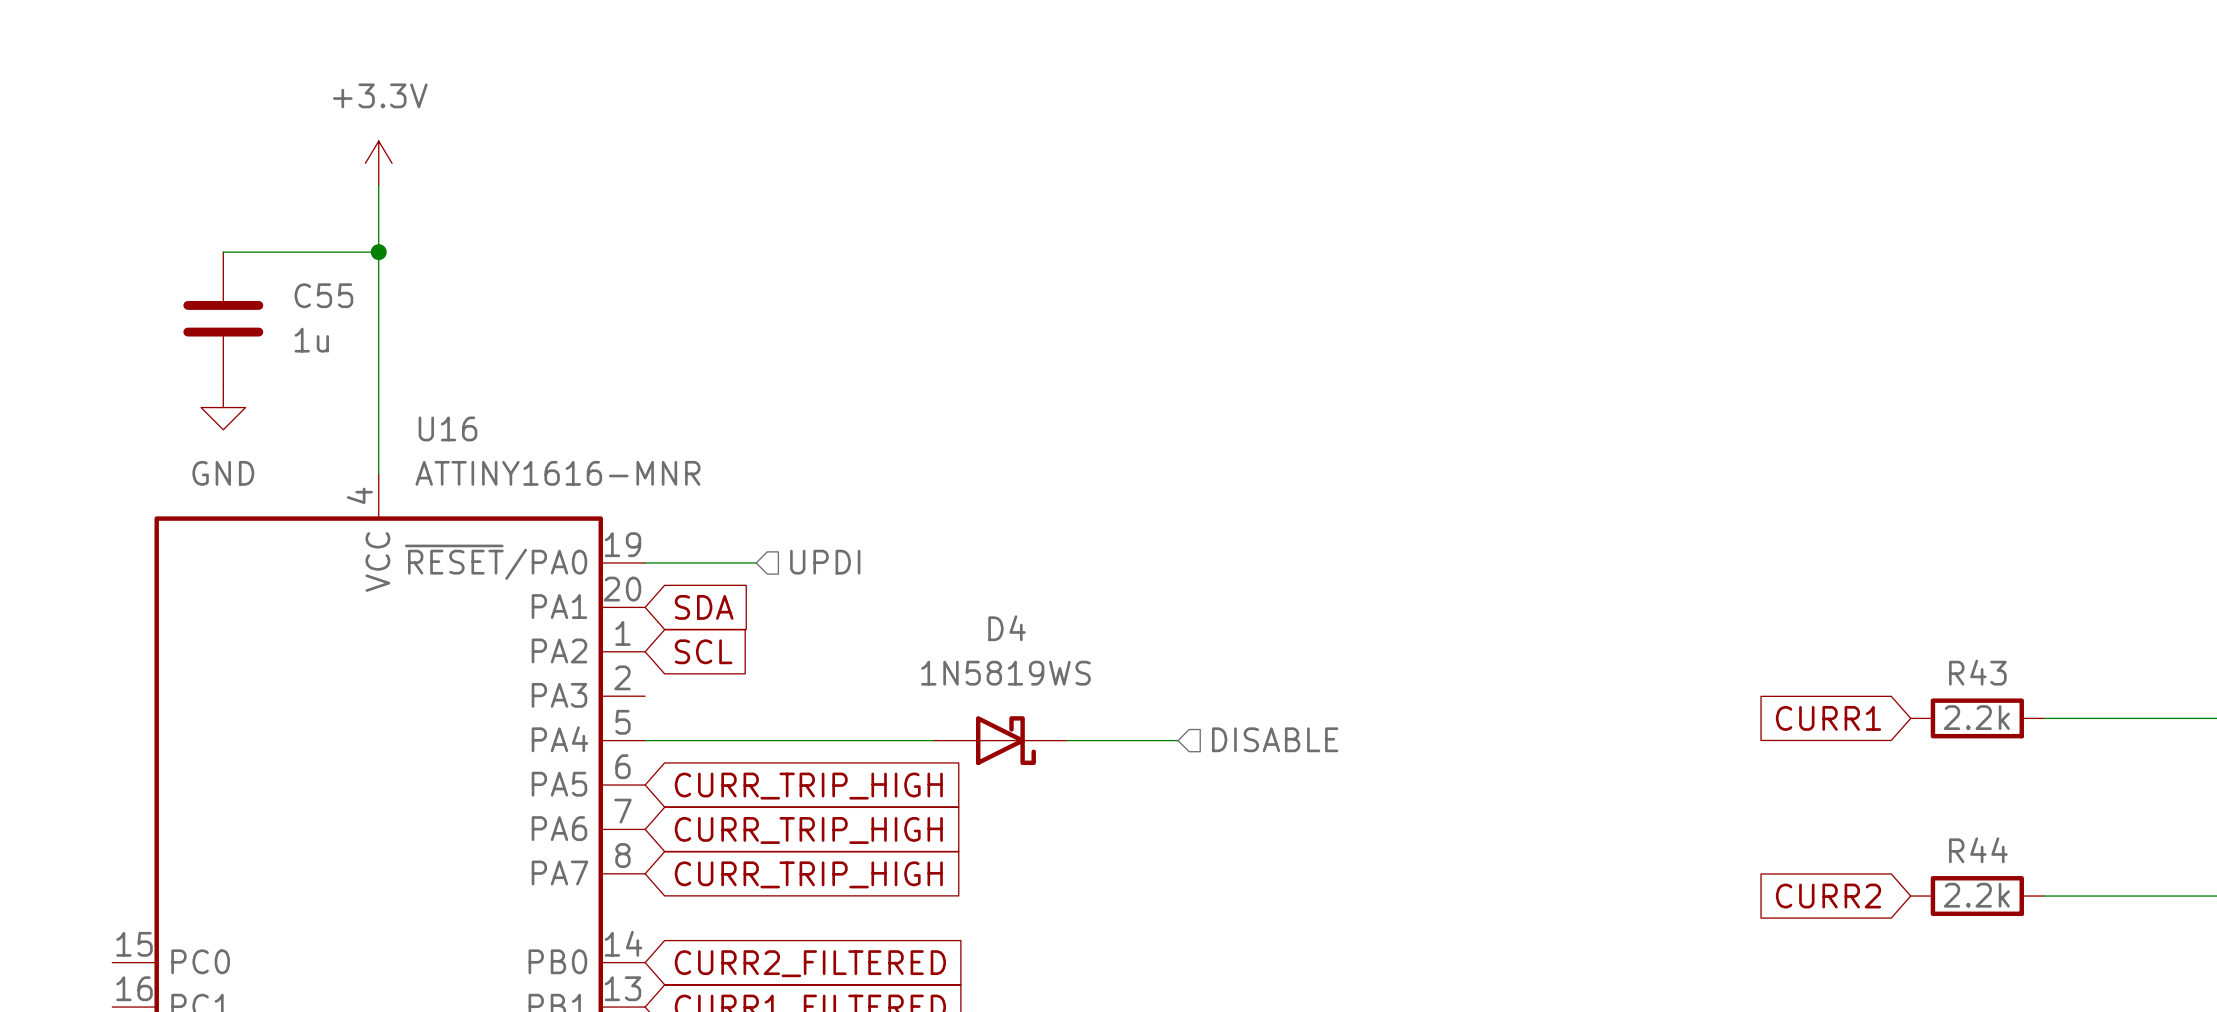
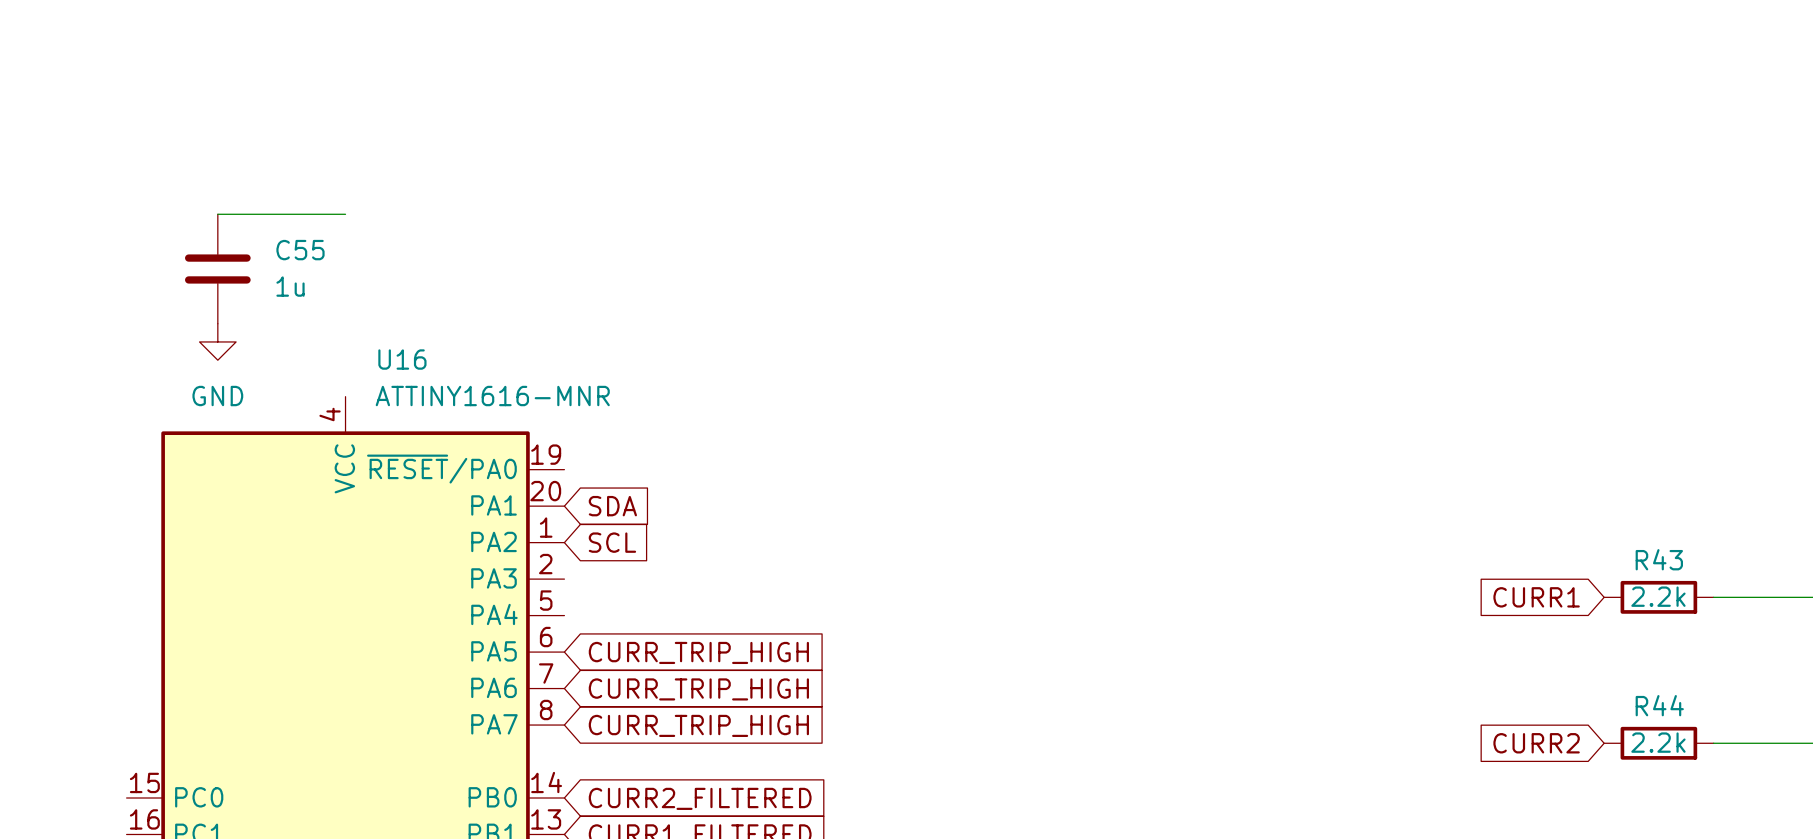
power symbol: +3.3V (378, 163) -> none
wire: (378, 185) (378, 474) -> none
junction: (378, 252) -> none
wire: (645, 562) (756, 562) -> none
hierarchical label: UPDI (825, 562) -> none
hierarchical label: DISABLE (1275, 739) -> none
wire: (645, 740) (933, 740) -> none
D4: 1N5819WS (1000, 740) -> none
wire: (1067, 740) (1178, 740) -> none

